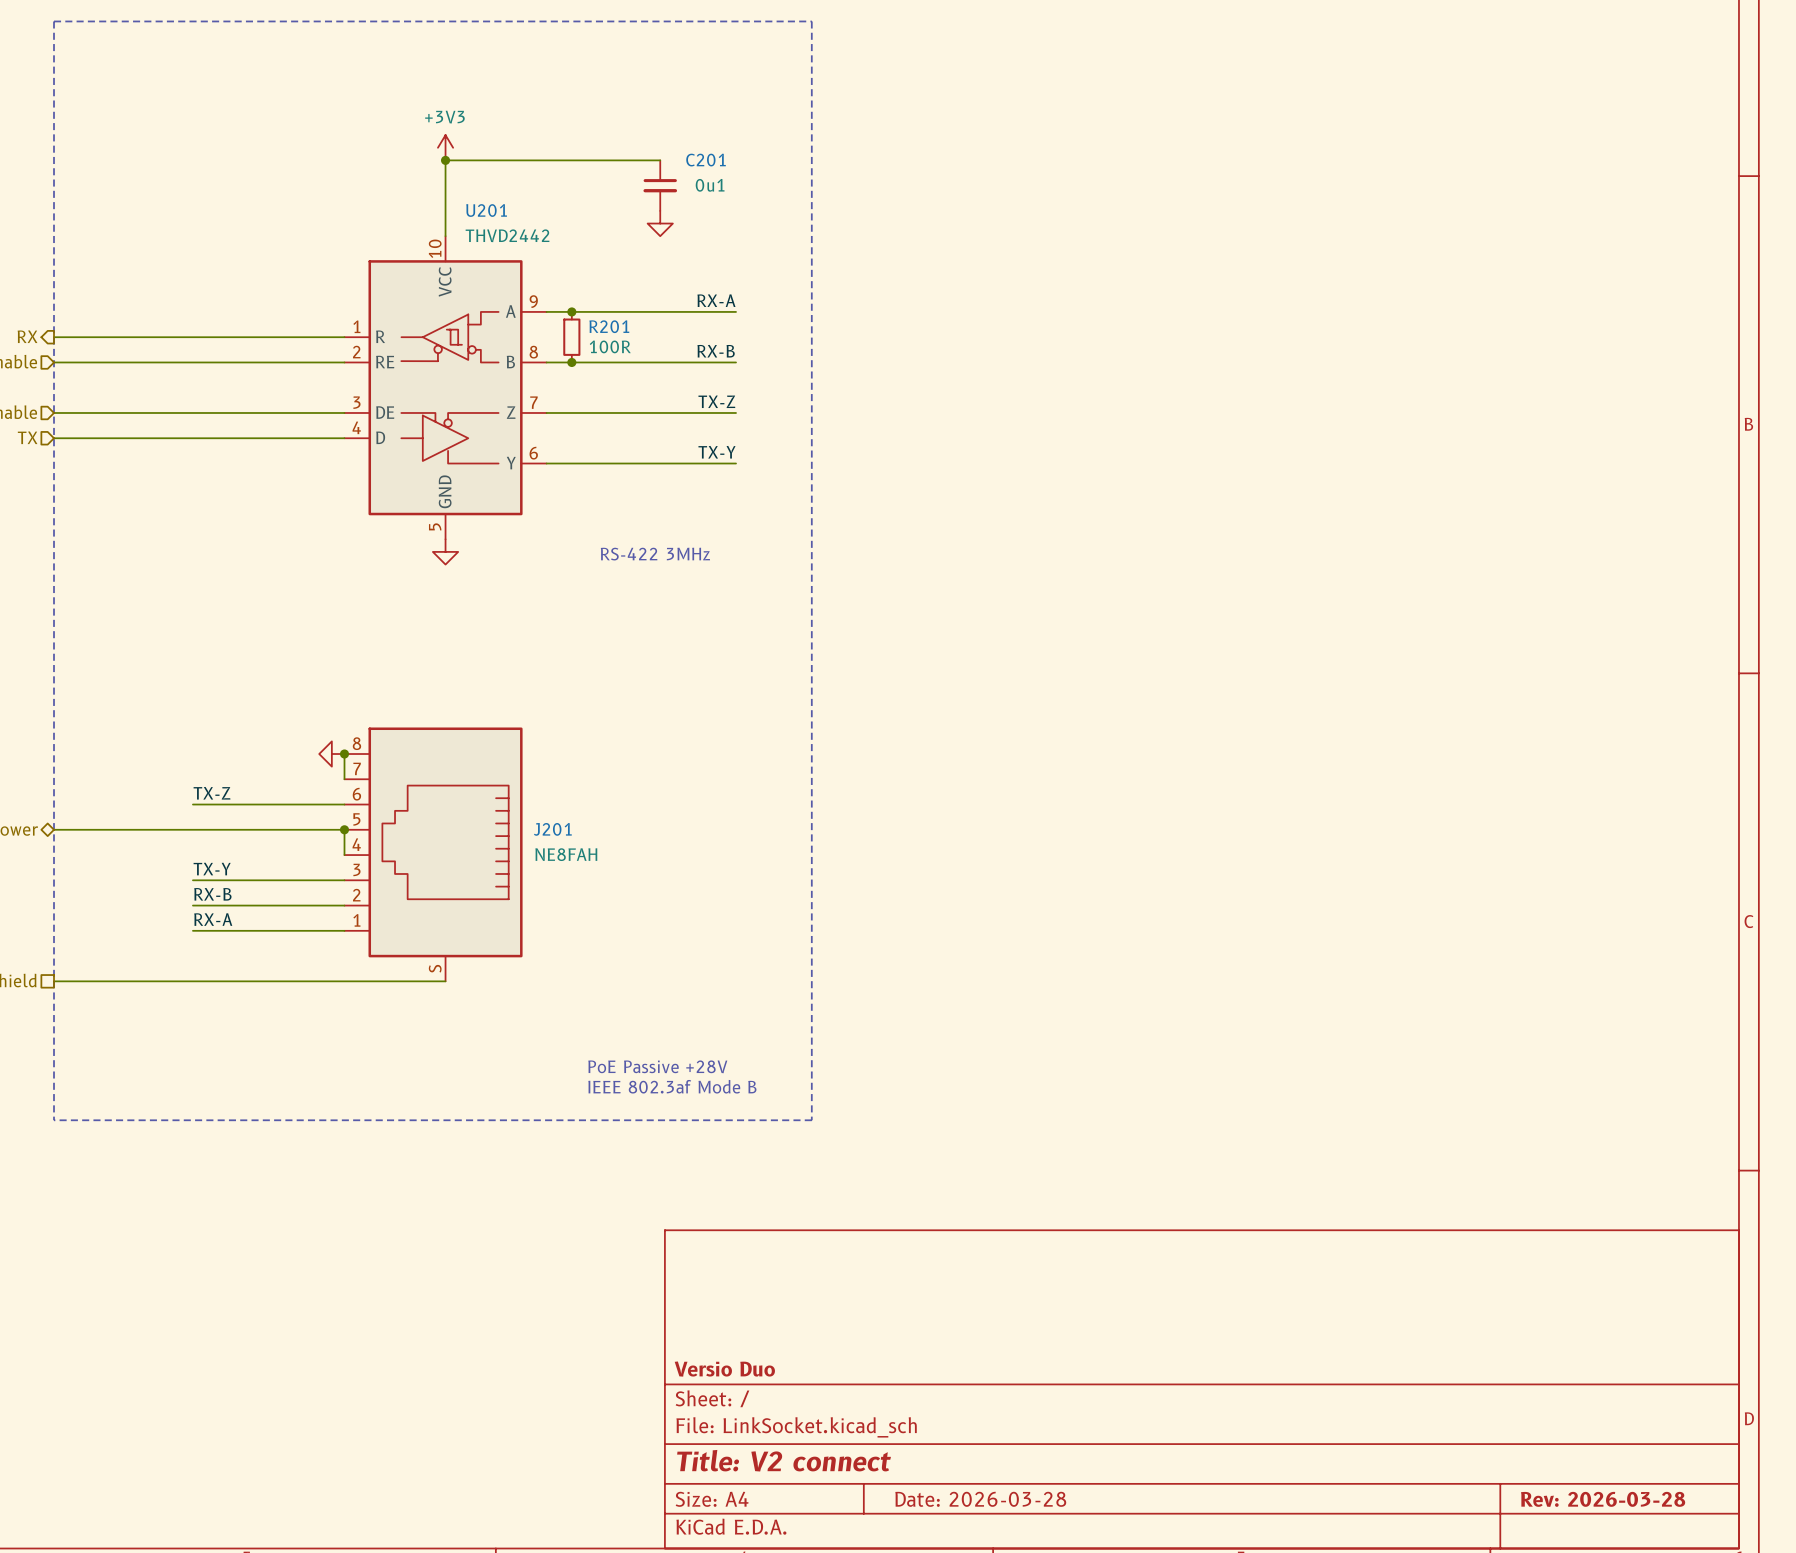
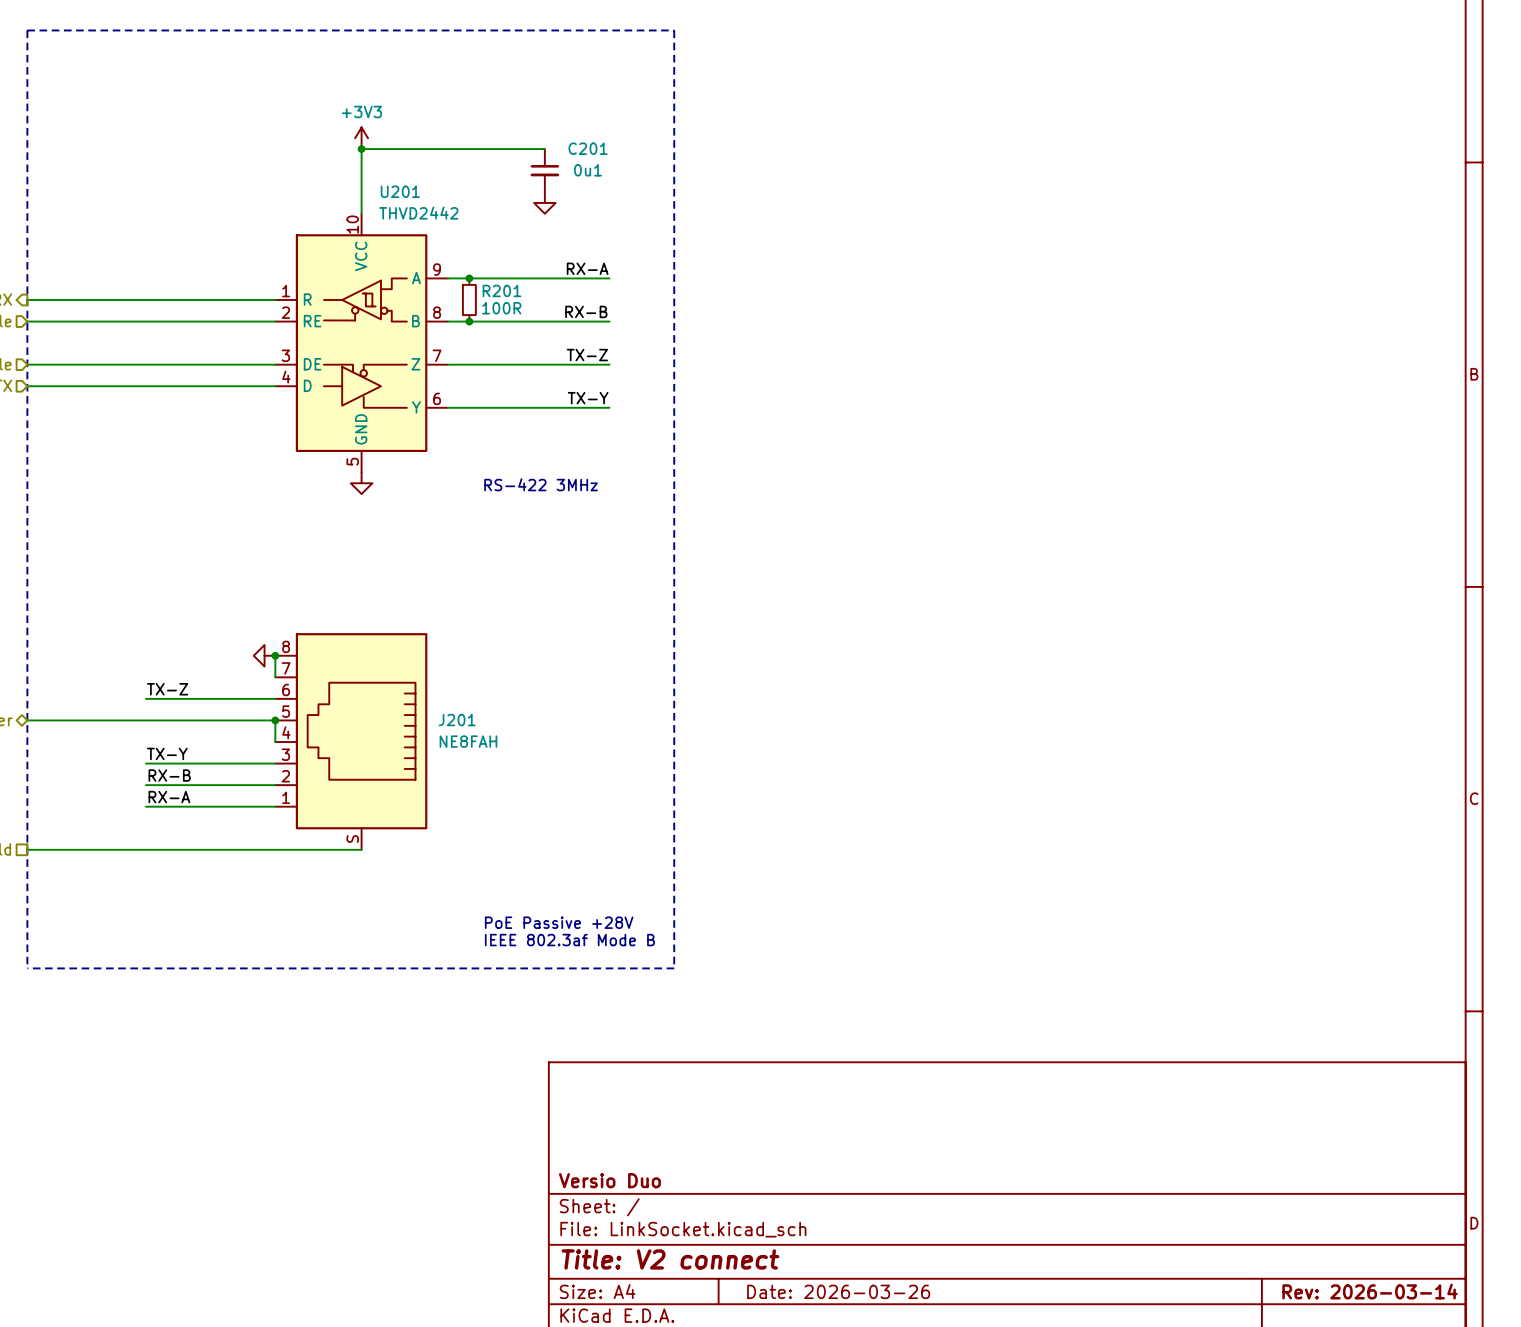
title block: Date: 2026-03-28 (980, 1499) -> Date: 2026-03-26 (838, 1291)
title block: Rev: 2026-03-28 (1603, 1499) -> Rev: 2026-03-14 (1370, 1291)

